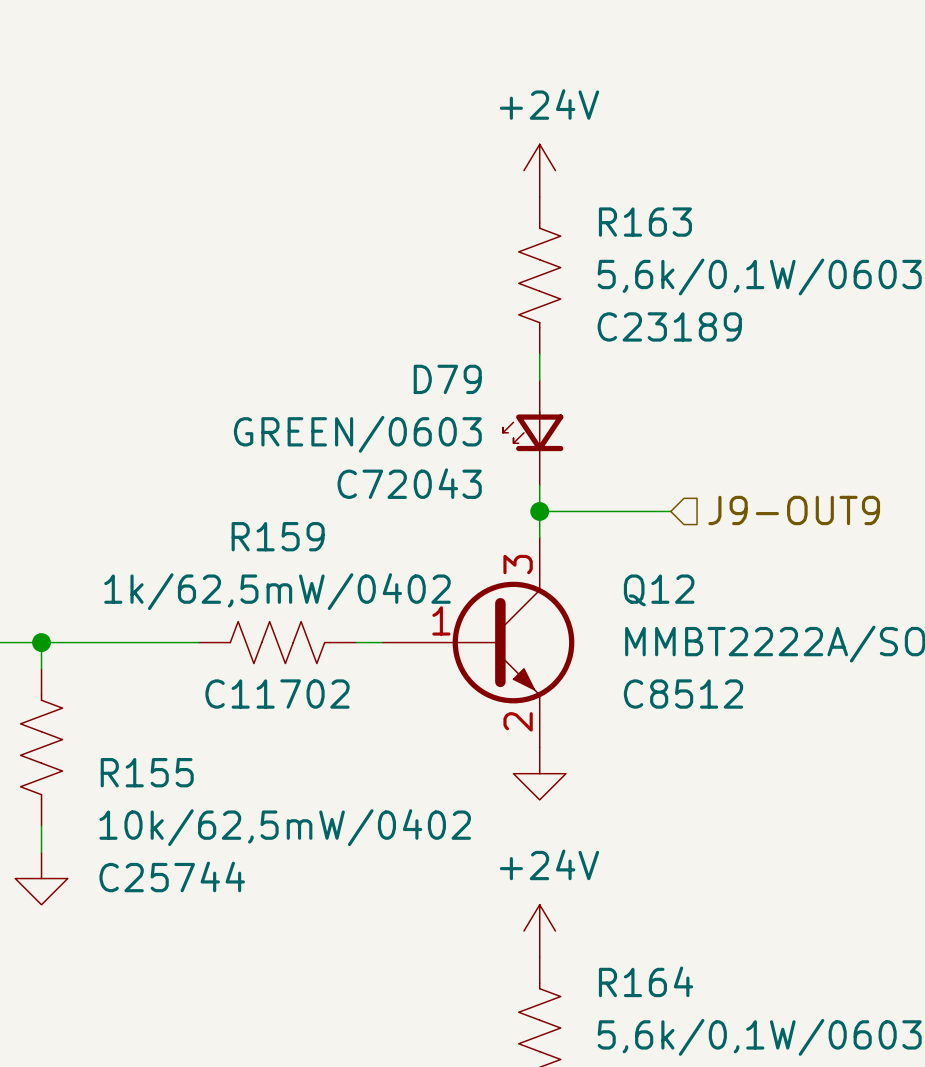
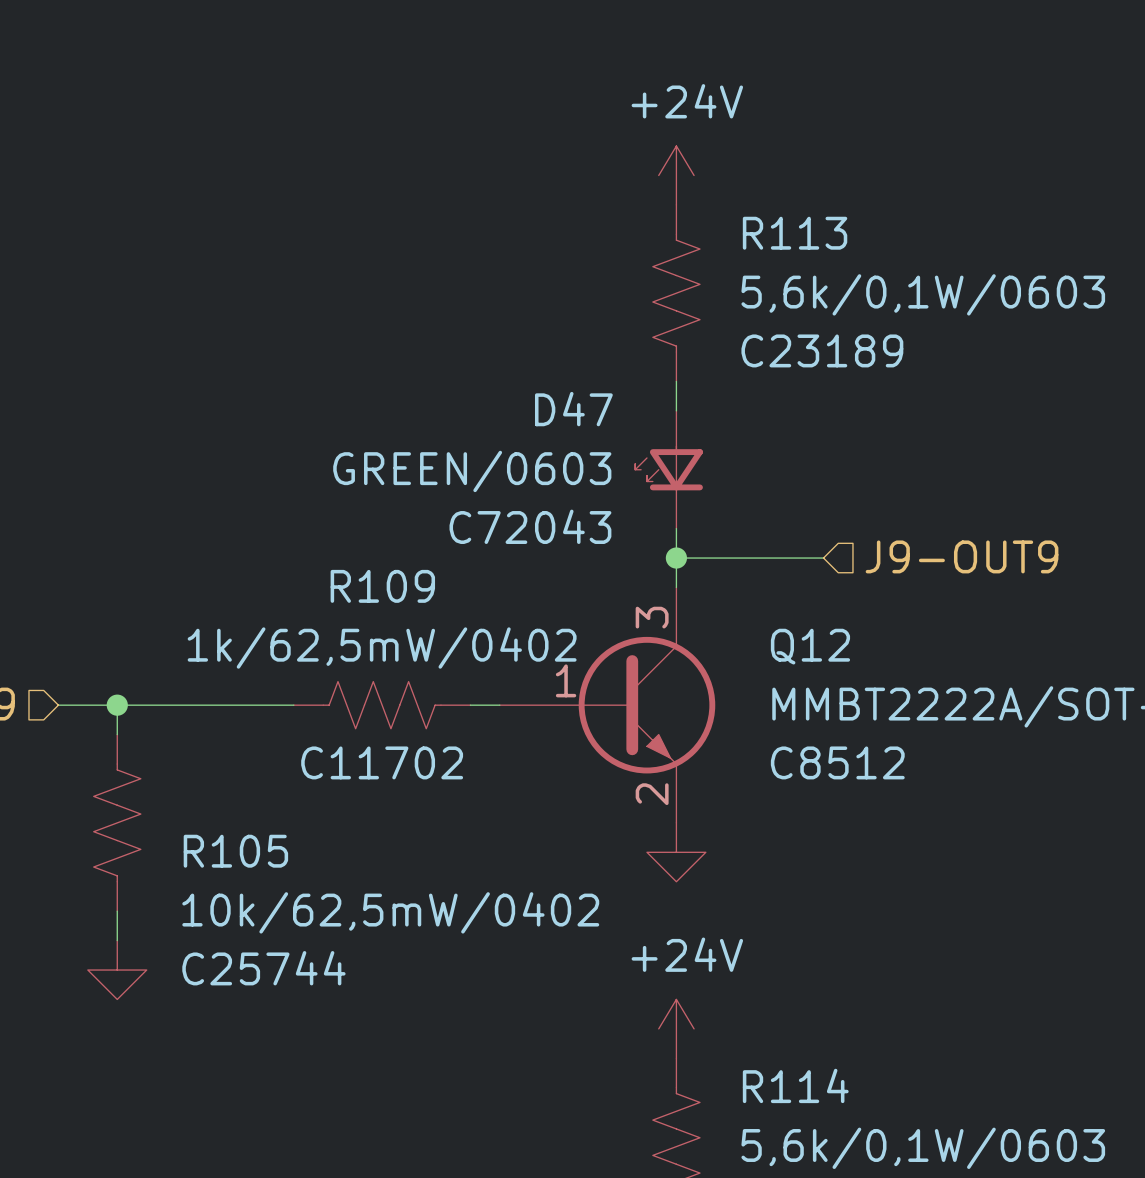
R163 name: R163 (645, 222) -> R113 (795, 233)
D79 name: D79 (447, 379) -> D47 (573, 409)
R159 name: R159 (278, 536) -> R109 (382, 586)
R155 name: R155 (147, 772) -> R105 (235, 851)
R164 name: R164 (646, 981) -> R114 (795, 1085)

